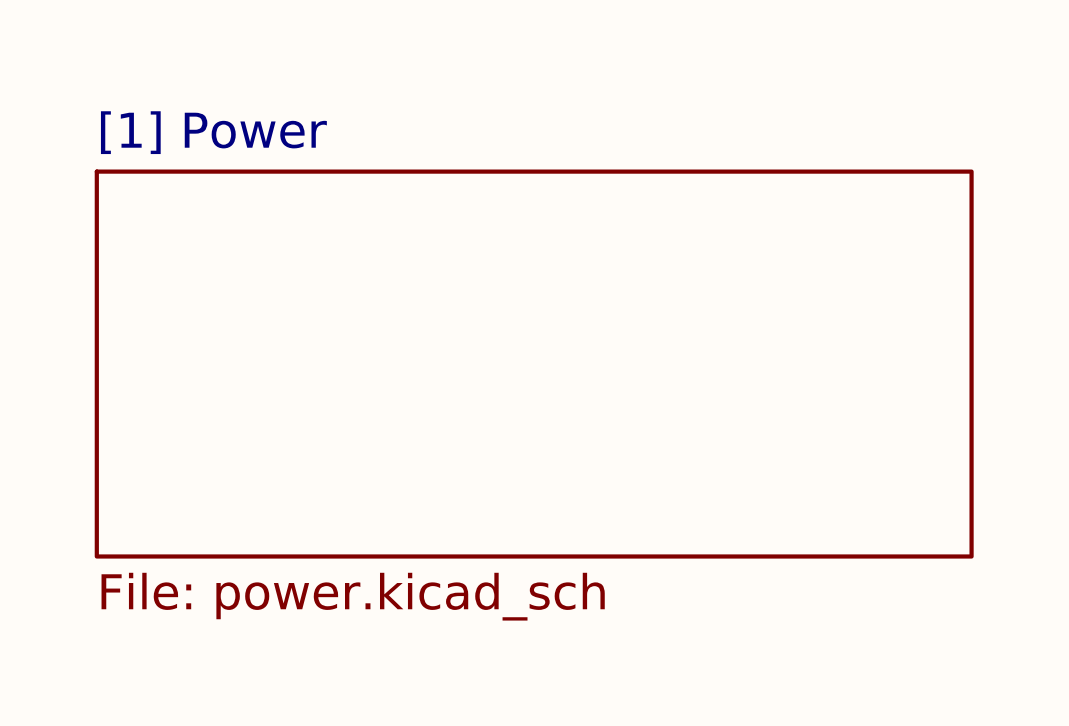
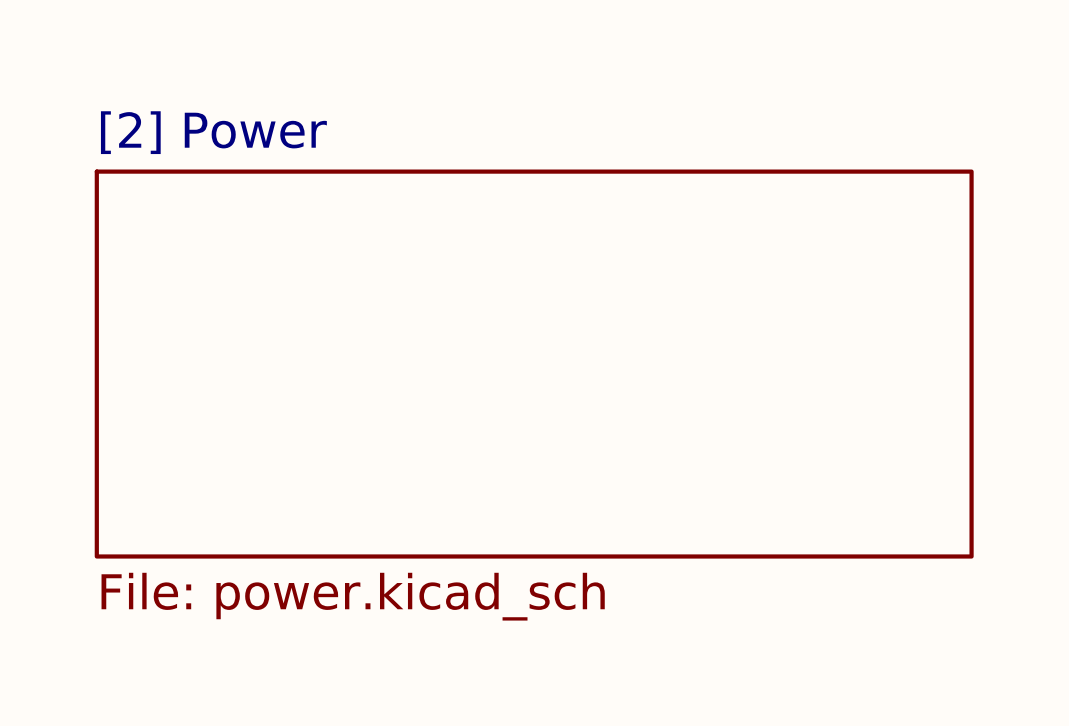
sheet [1] Power name: [1] Power (213, 132) -> [2] Power (213, 132)

